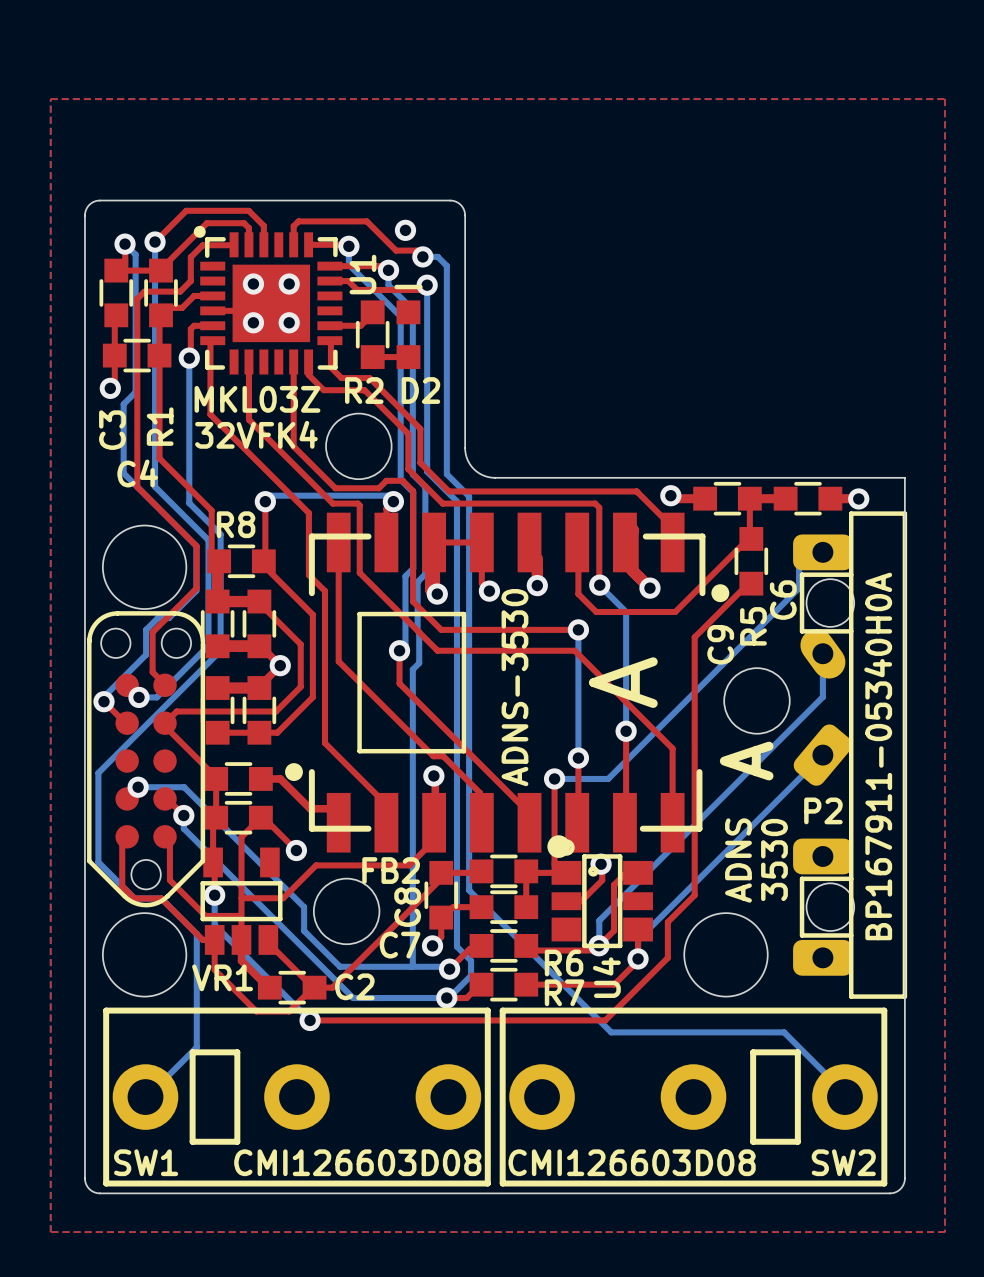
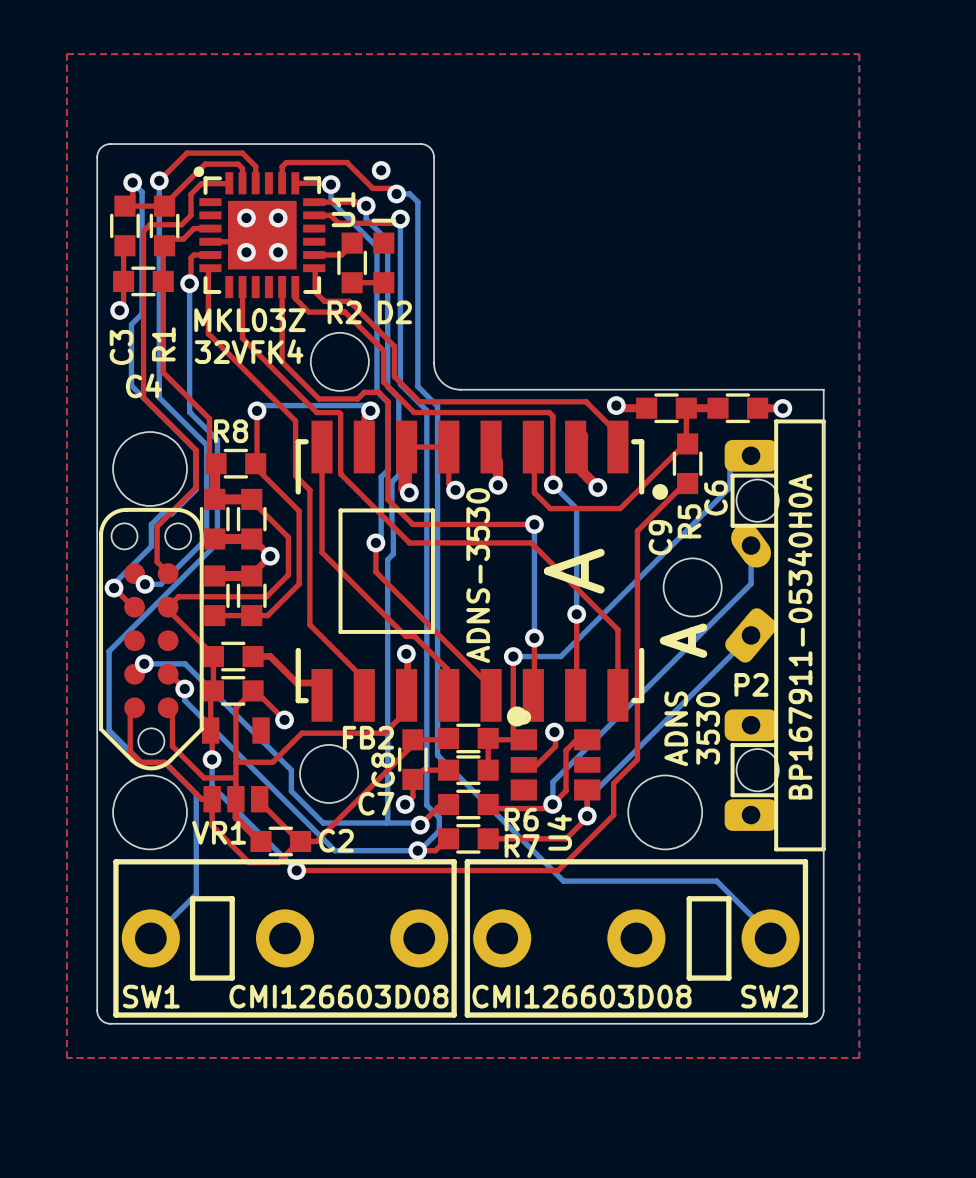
part footprint: [285, 512, 730, 853] -> [295, 420, 669, 722]
U4 footprint: [551, 839, 653, 949] -> [510, 710, 601, 801]
VR1 footprint: [200, 847, 283, 955] -> [202, 717, 270, 813]

